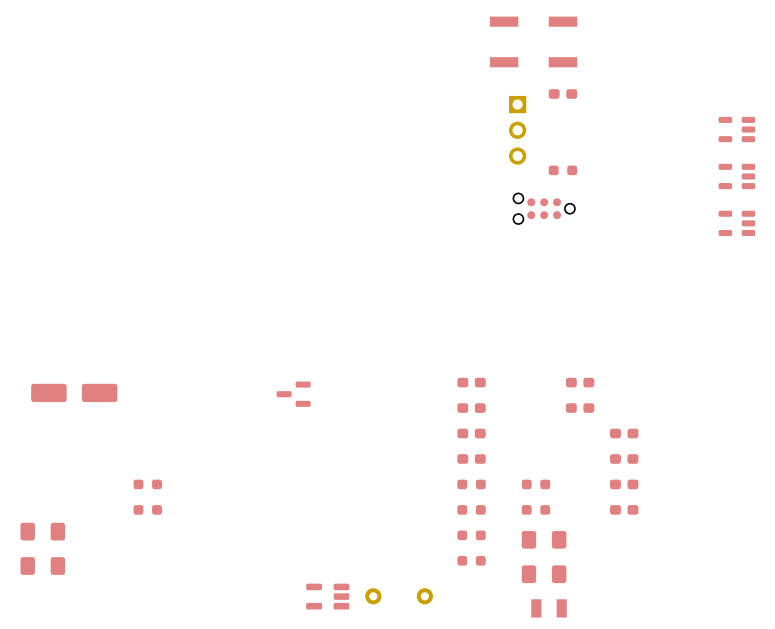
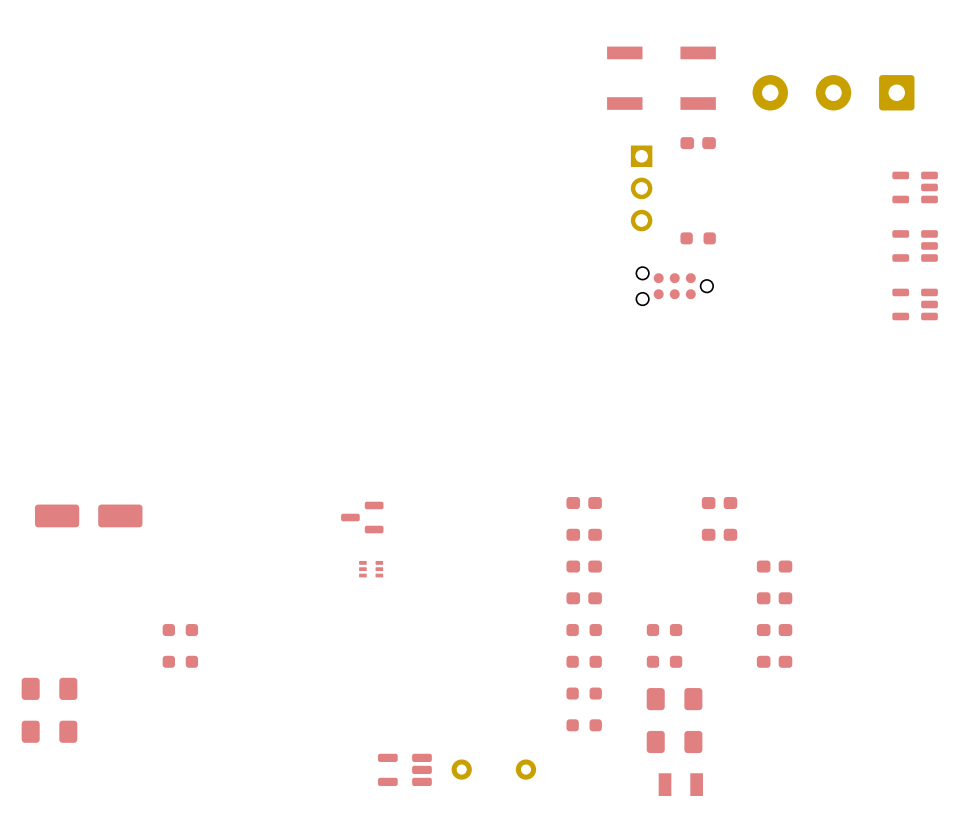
part: none -> (833, 92)
part: none -> (371, 569)

